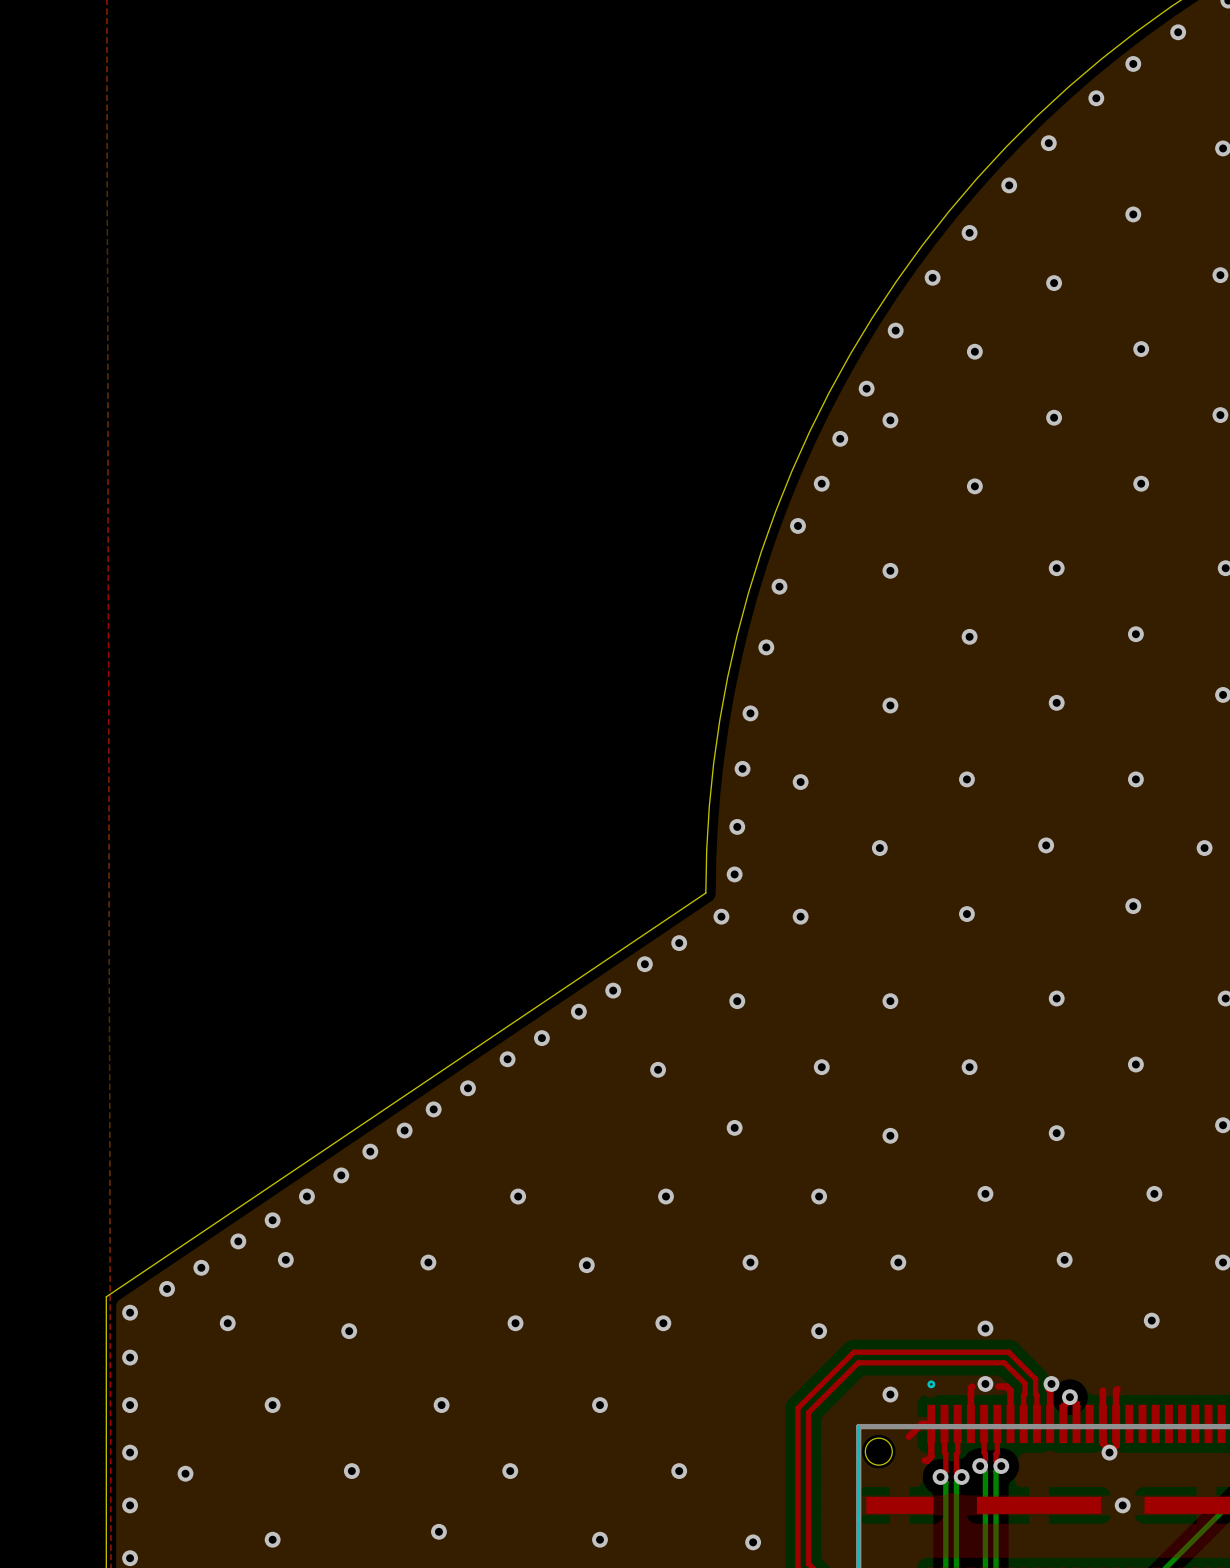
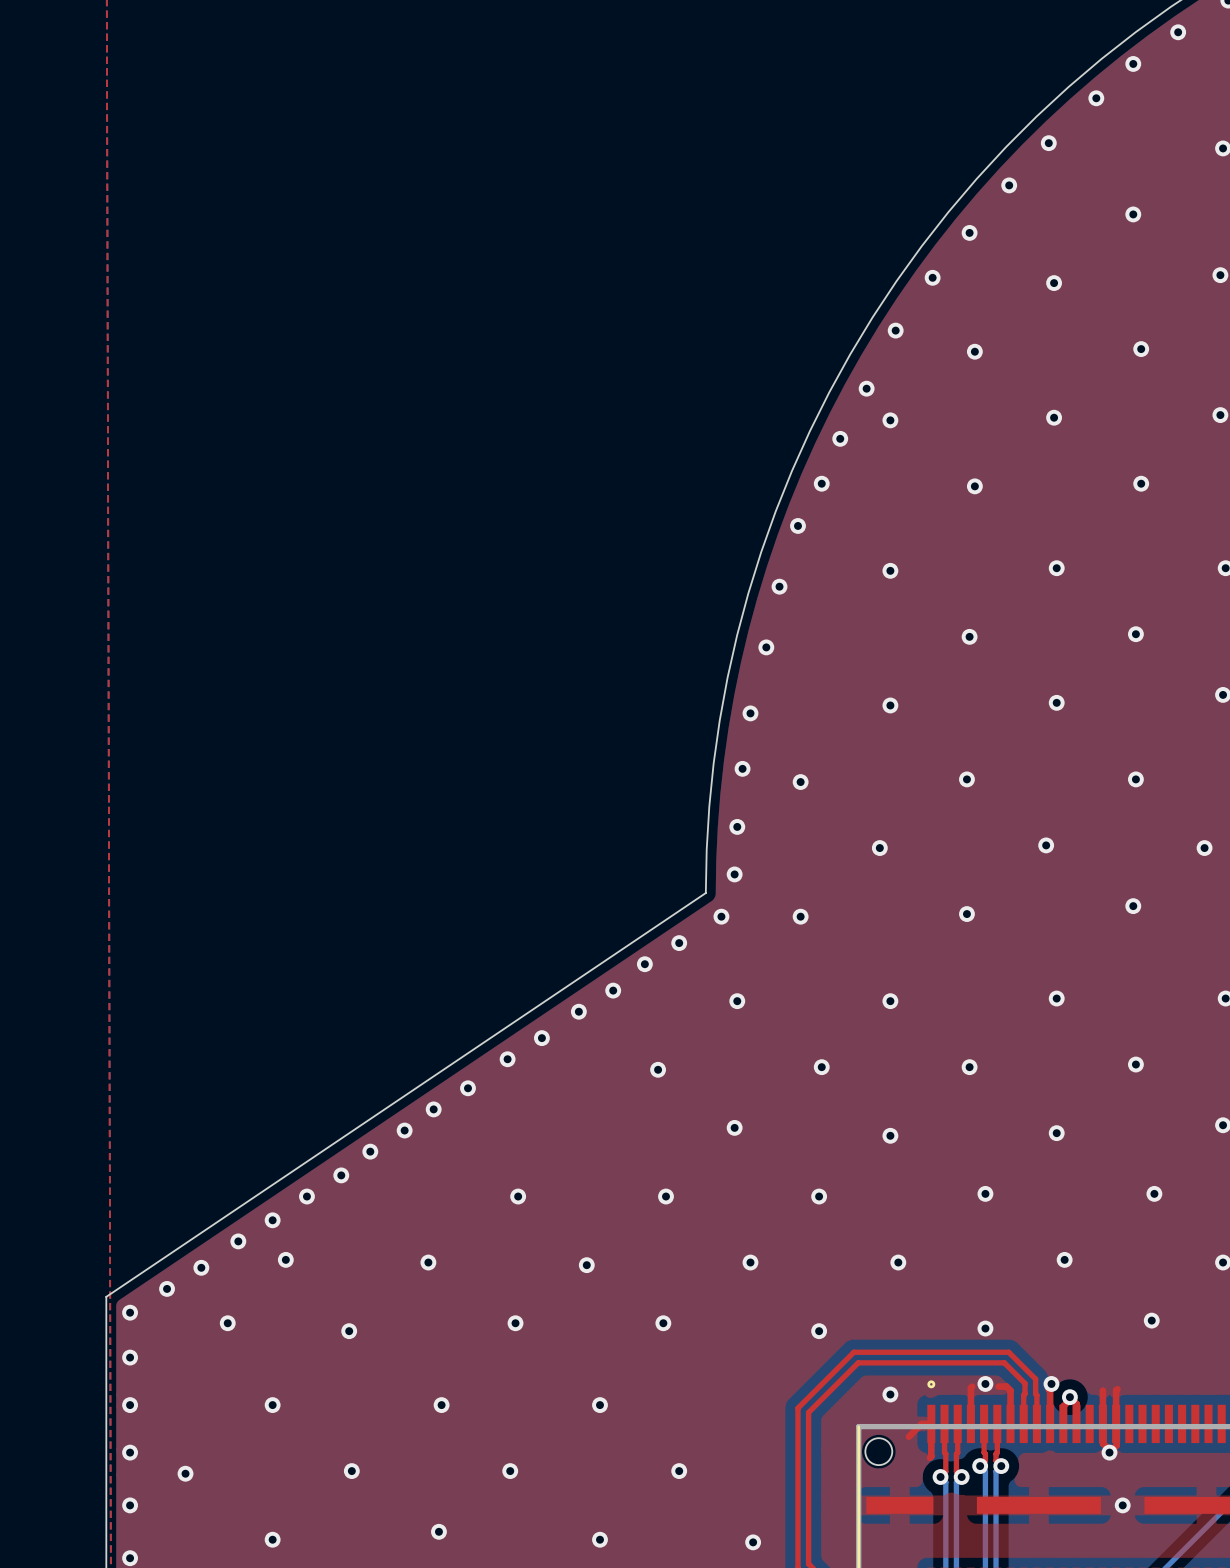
top track: (930, 1457) (924, 1460) -> none

